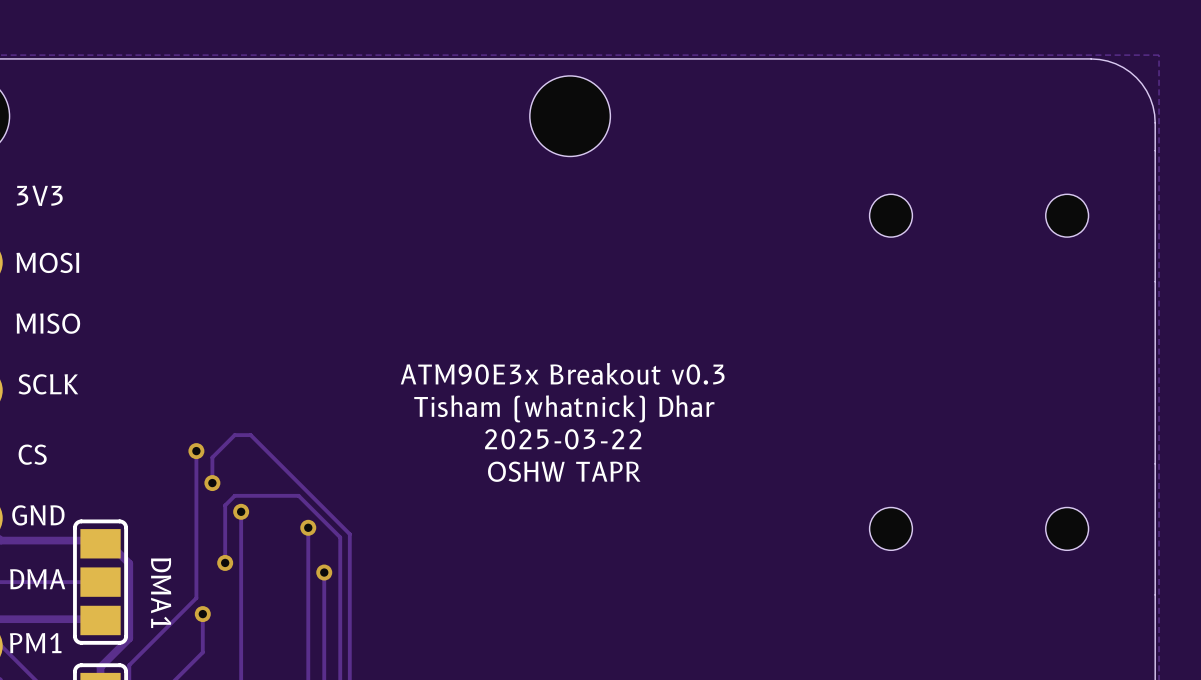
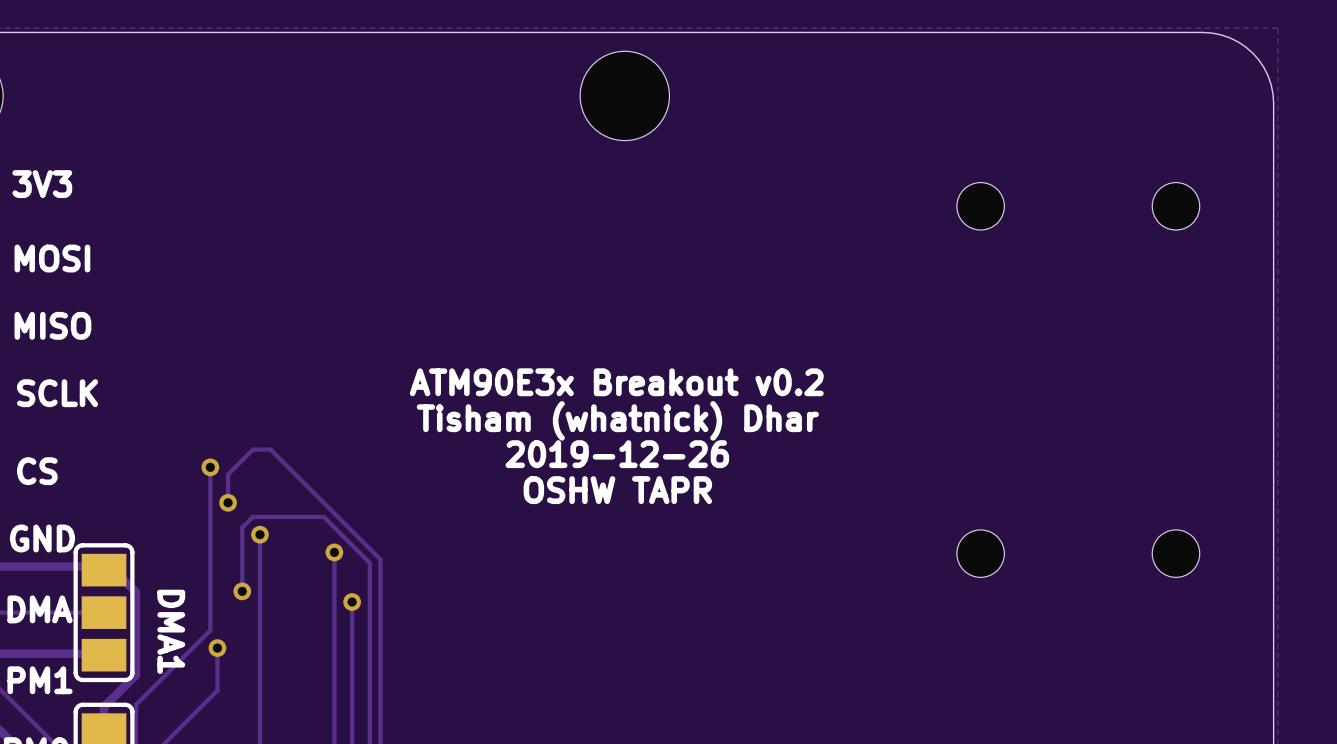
text: ATM90E3x Breakout v0.3 (562, 373) -> ATM90E3x Breakout v0.2 (616, 382)
text: 2025-03-22 (563, 439) -> 2019-12-26 (617, 454)

